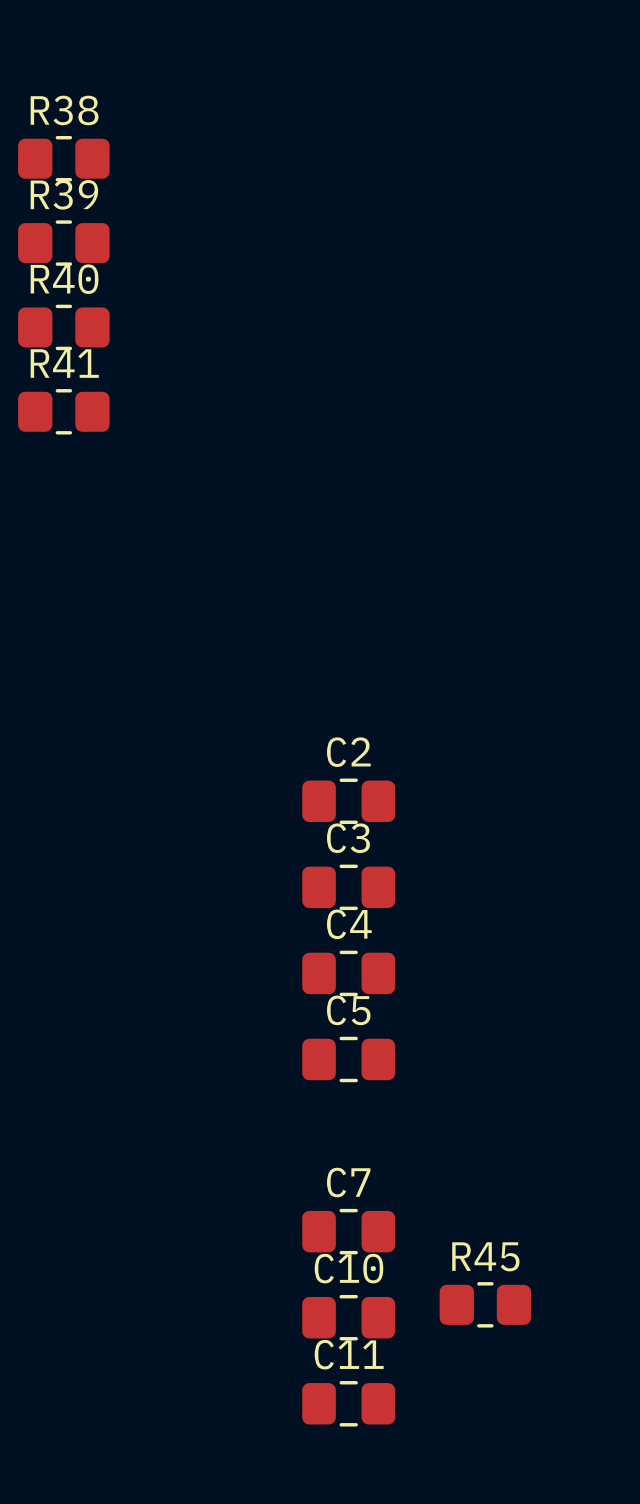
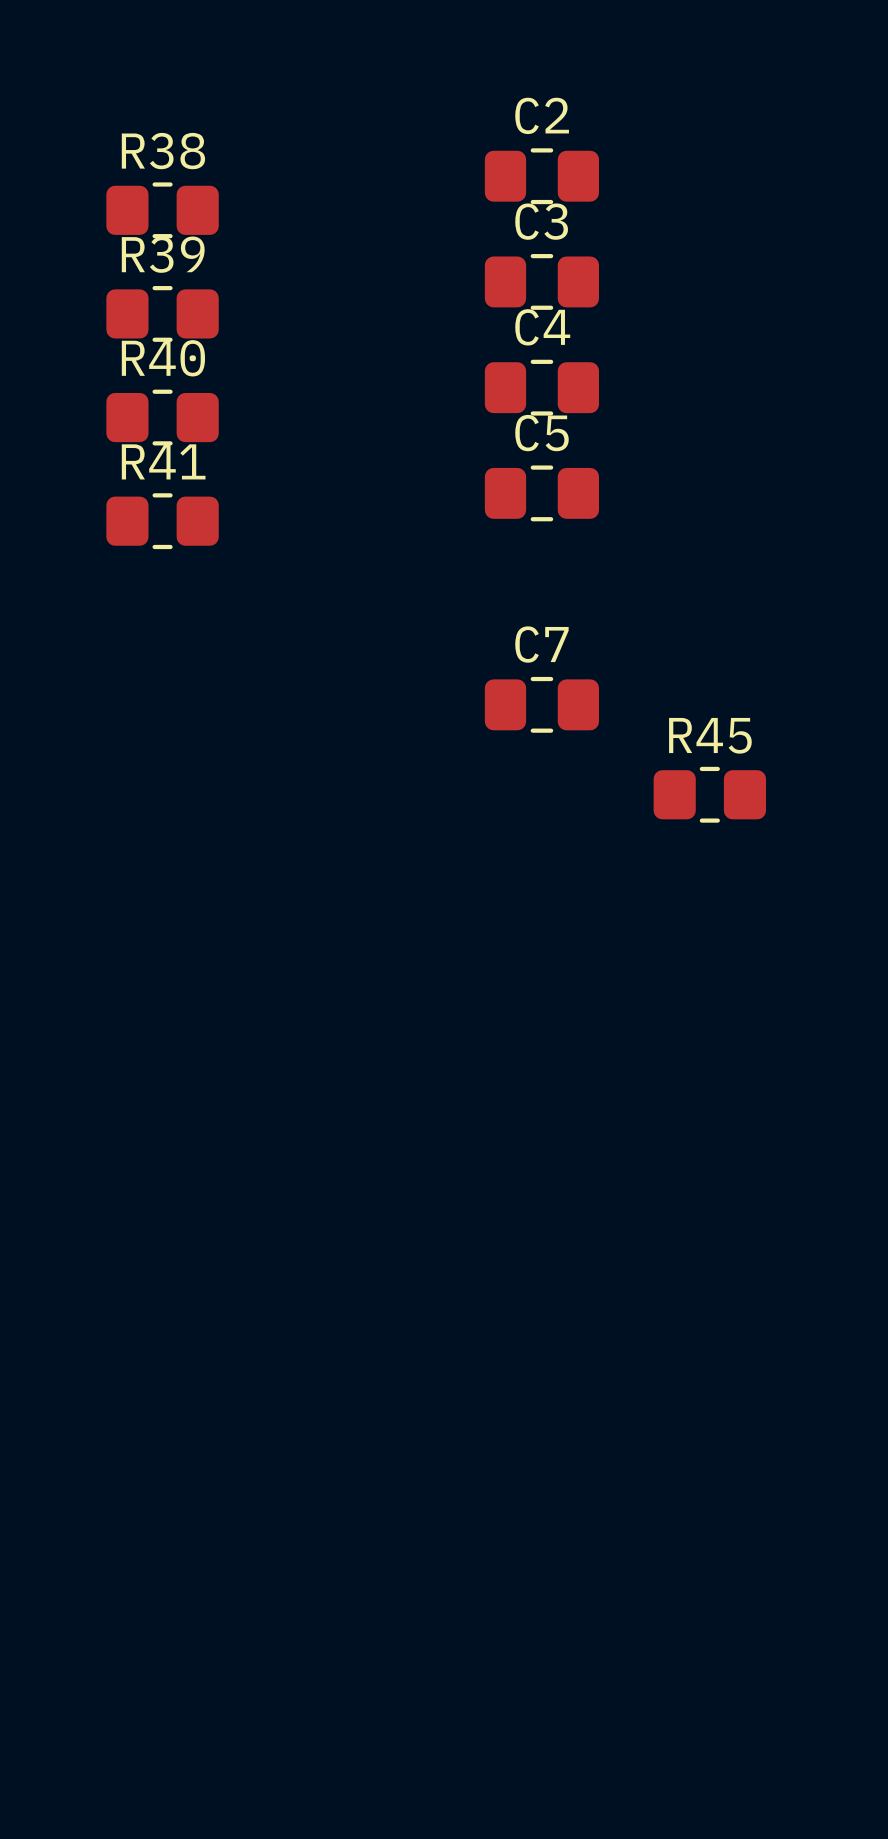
C2 position: (348, 801) -> (541, 176)
C3 position: (348, 887) -> (541, 281)
C4 position: (348, 973) -> (541, 387)
C5 position: (348, 1059) -> (541, 493)
C7 position: (348, 1231) -> (541, 704)
R45 position: (485, 1304) -> (709, 794)
C10: (348, 1317) -> none
C11: (348, 1403) -> none

